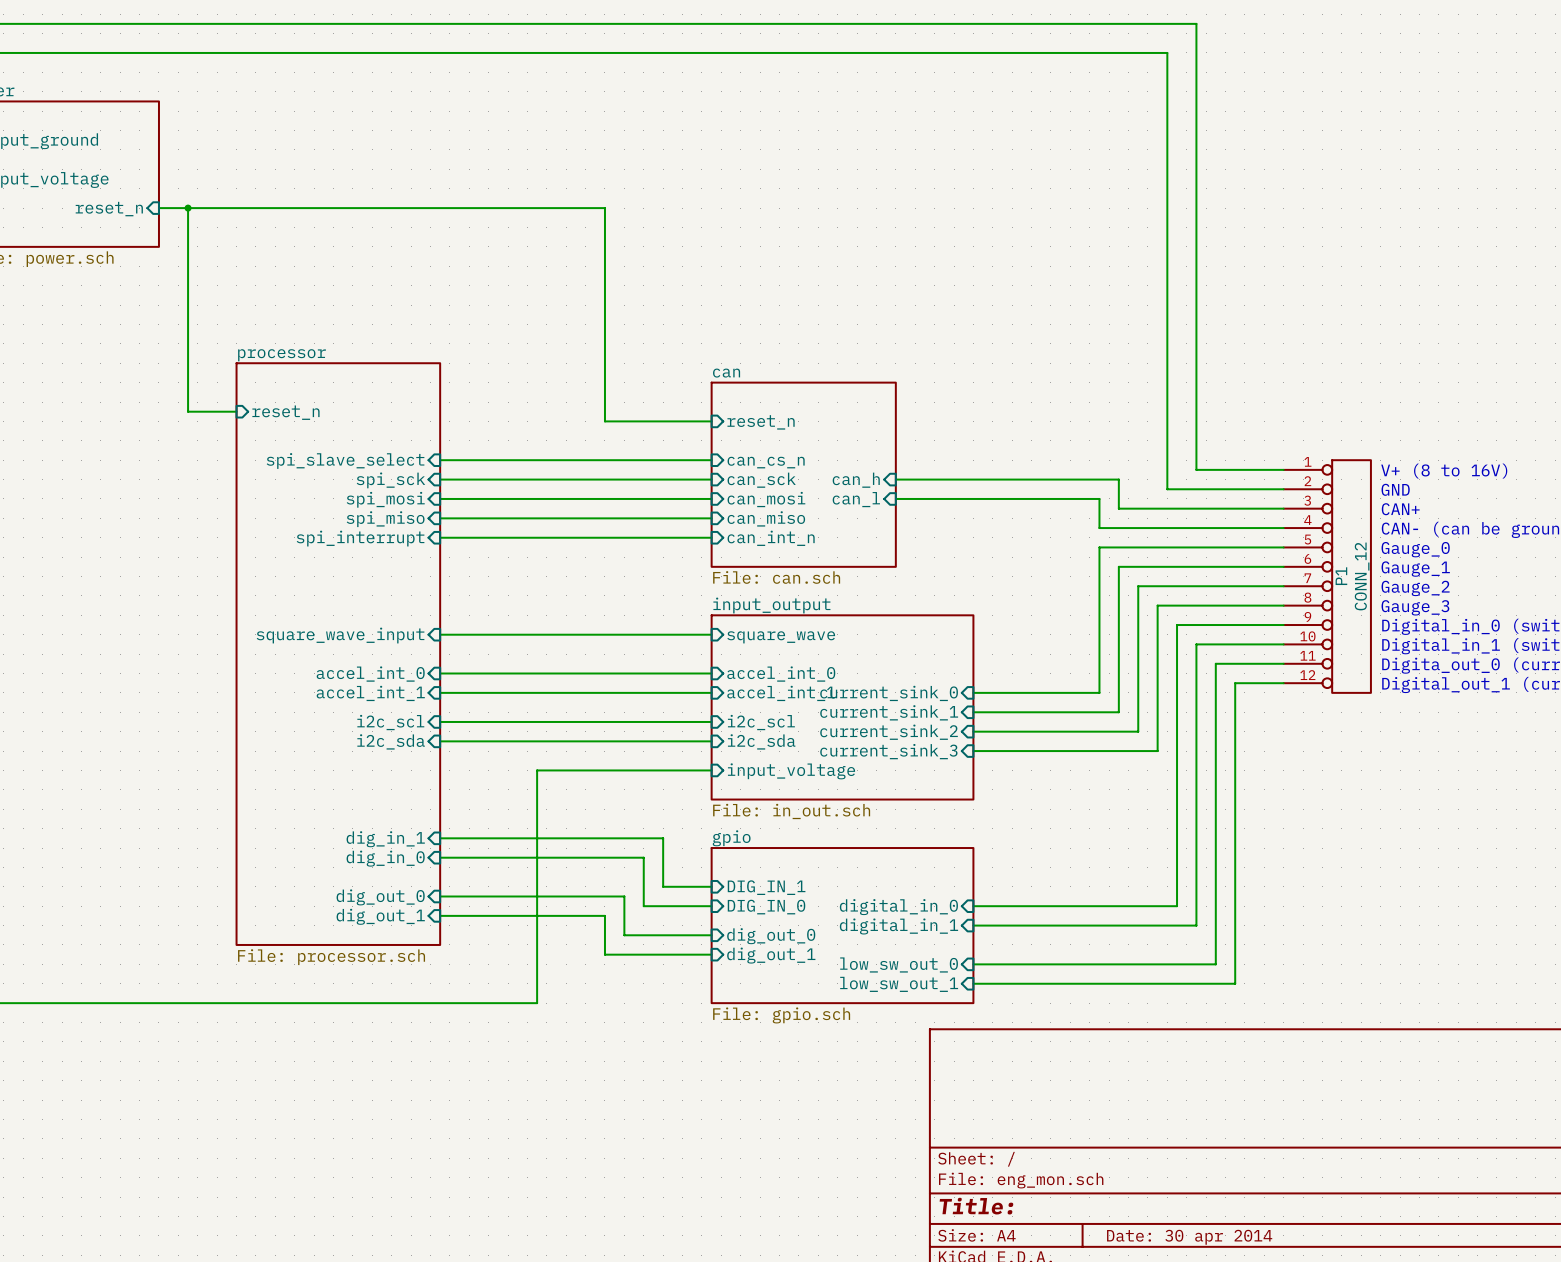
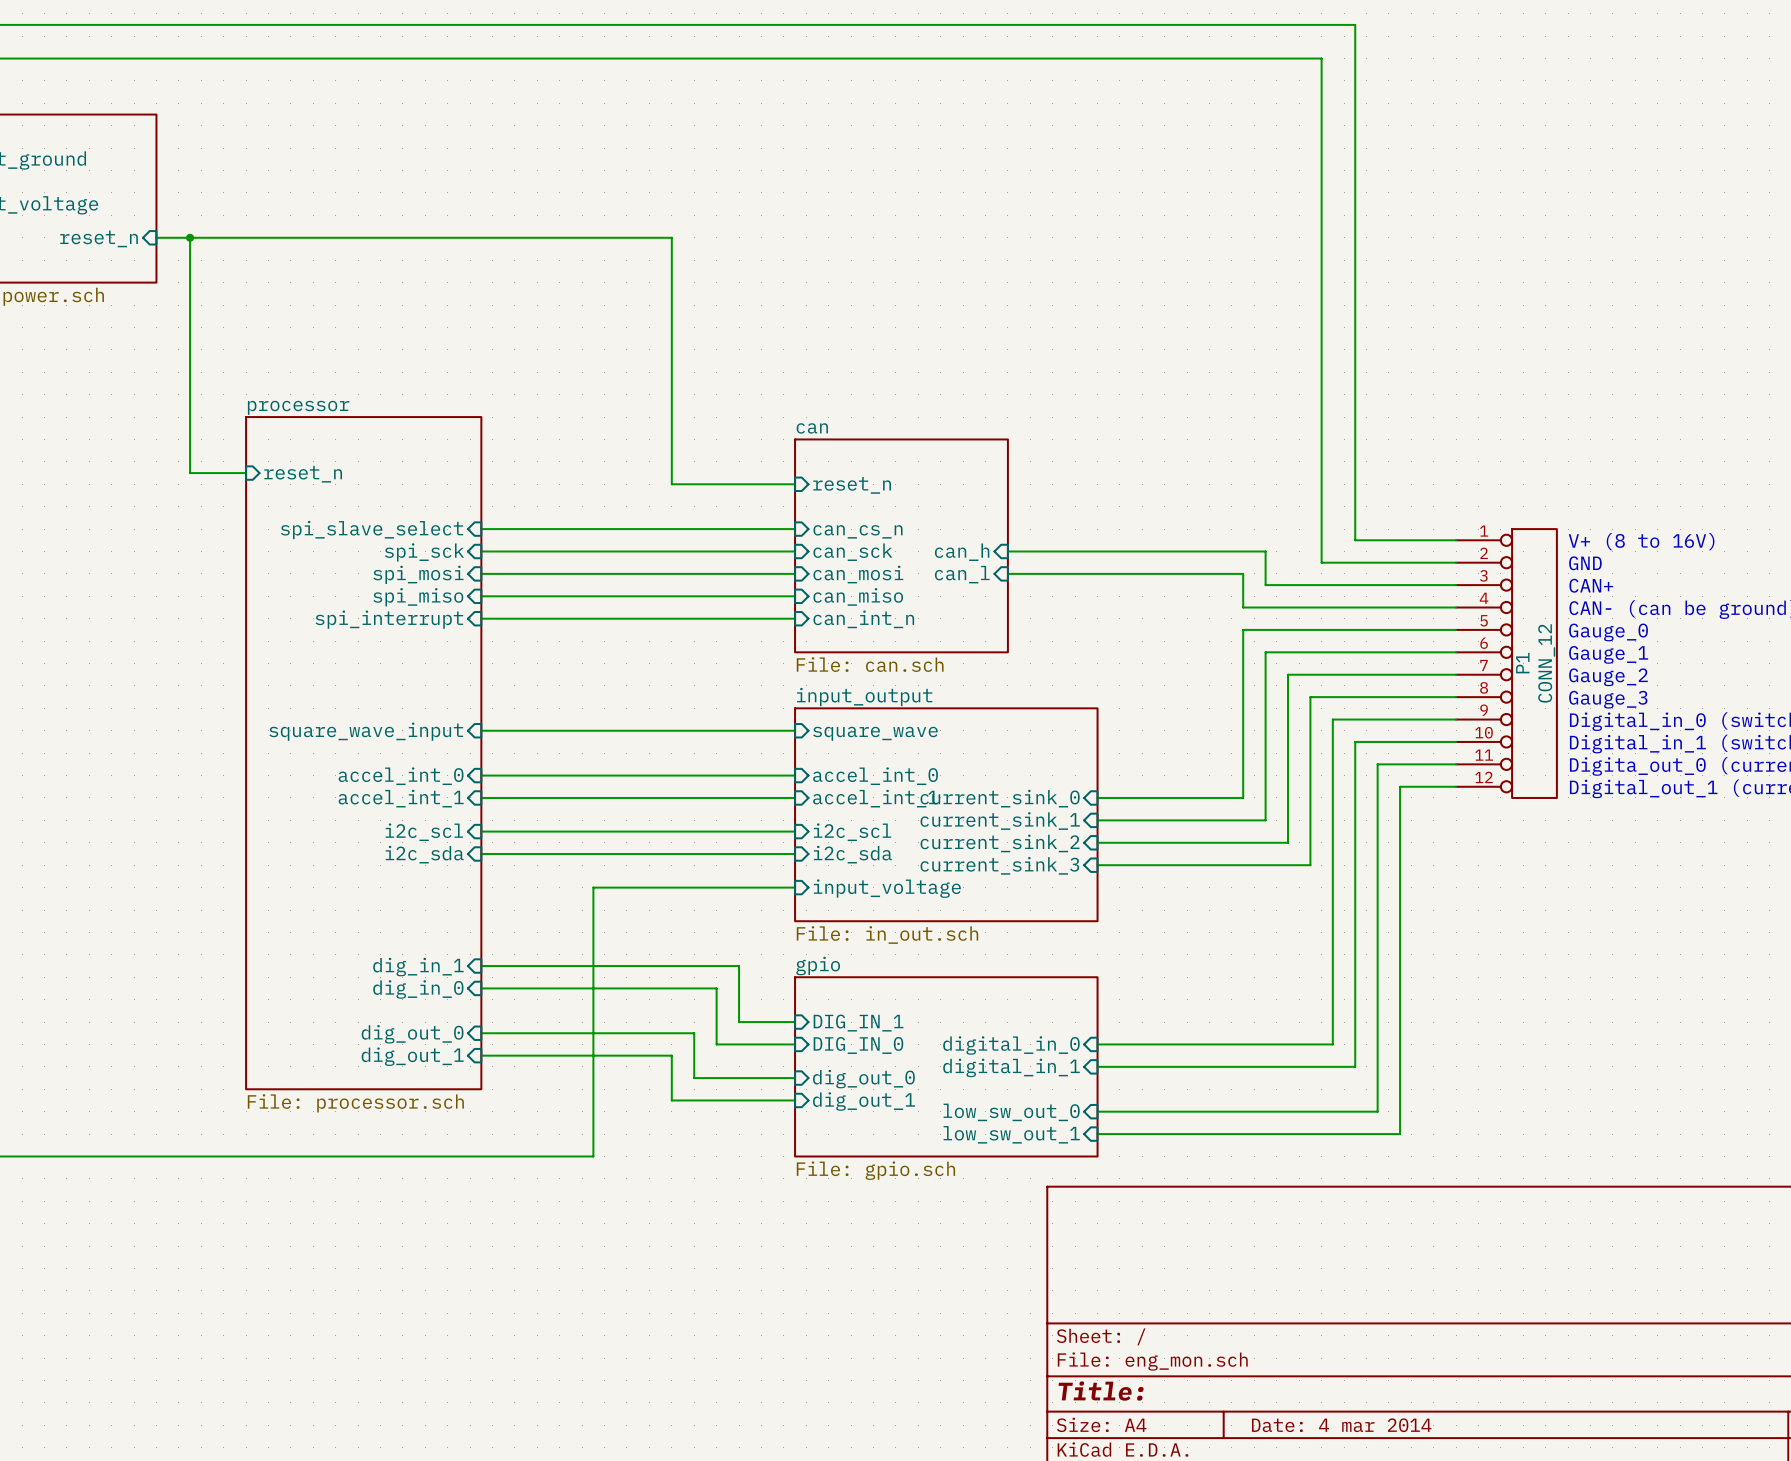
title block: Date: 30 apr 2014 (1189, 1237) -> Date: 4 mar 2014 (1341, 1425)

